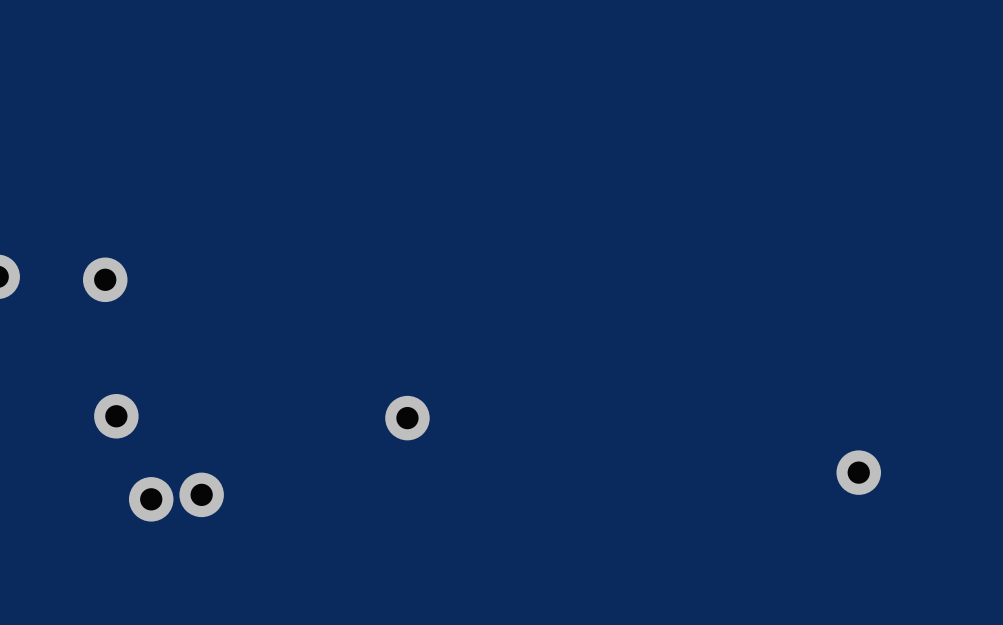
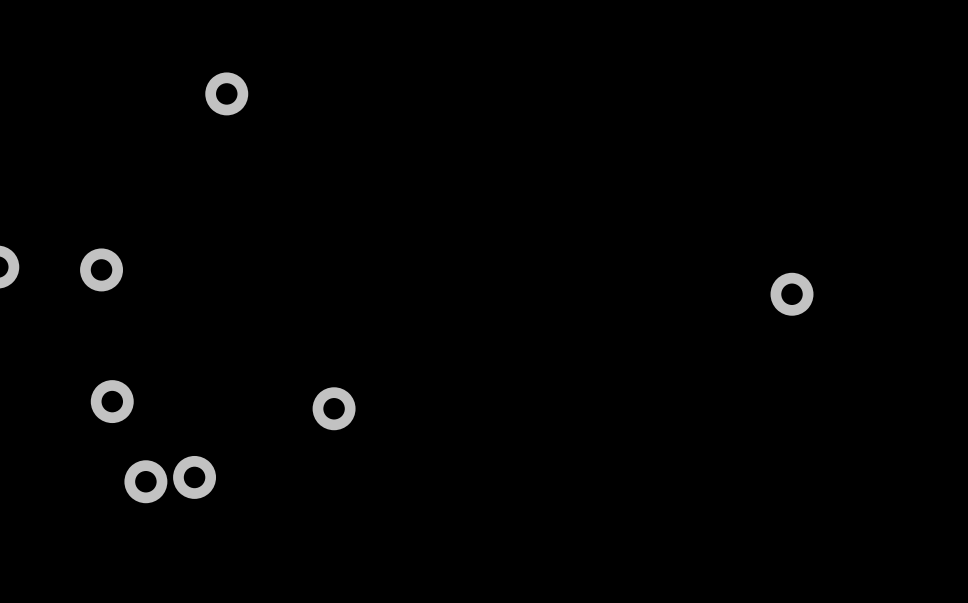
via: none -> (226, 93)
via: none -> (792, 294)
via position: (407, 418) -> (334, 408)
via: (858, 472) -> none

